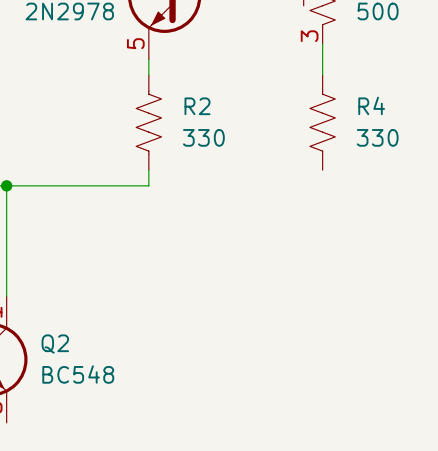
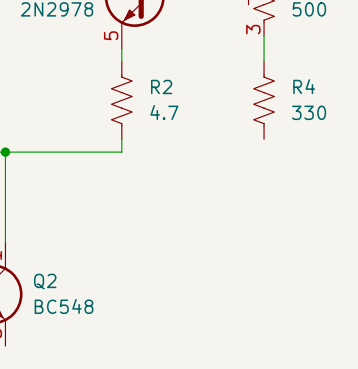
R2 value: 330 (203, 137) -> 4.7 (164, 112)

